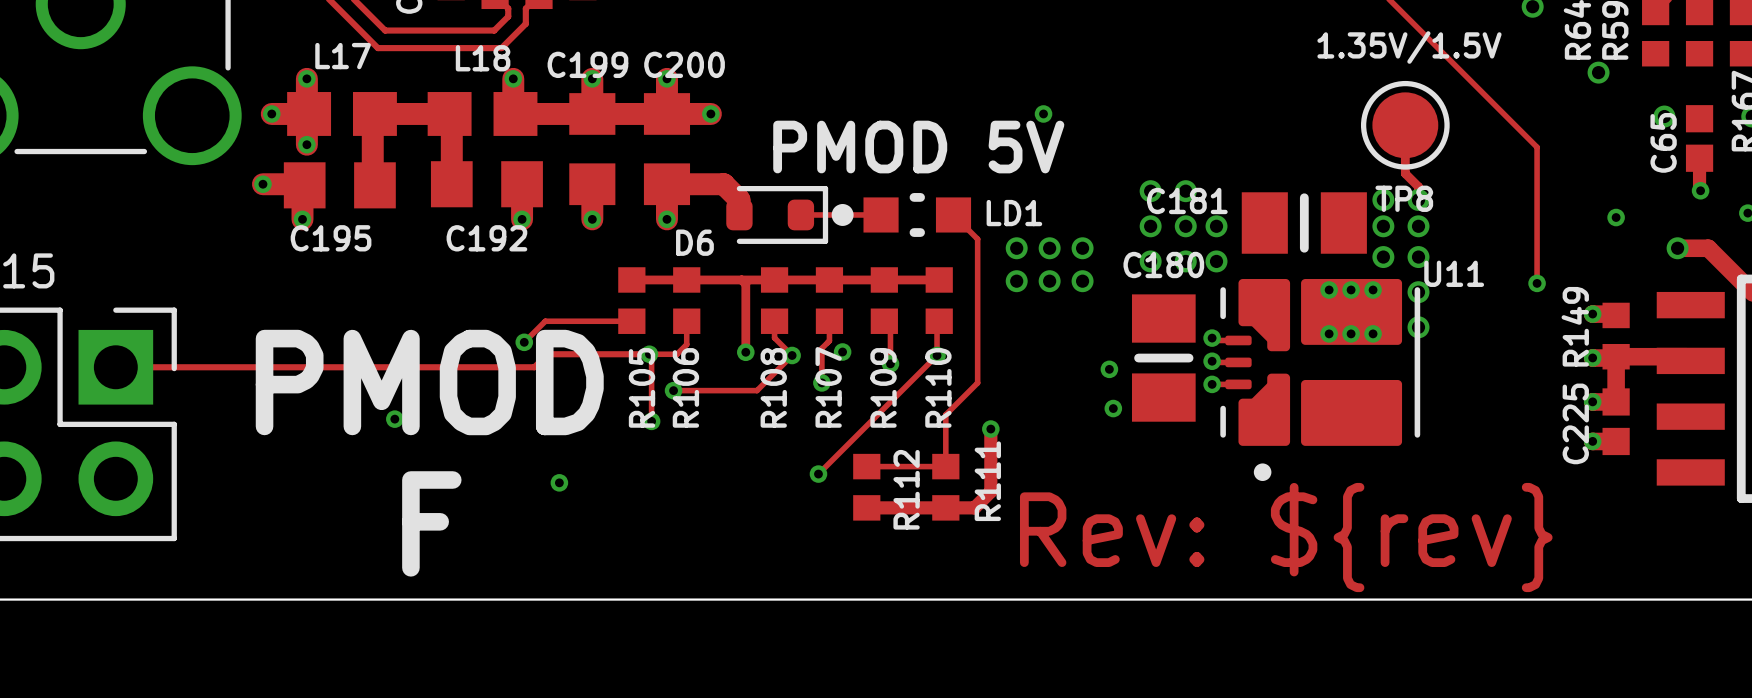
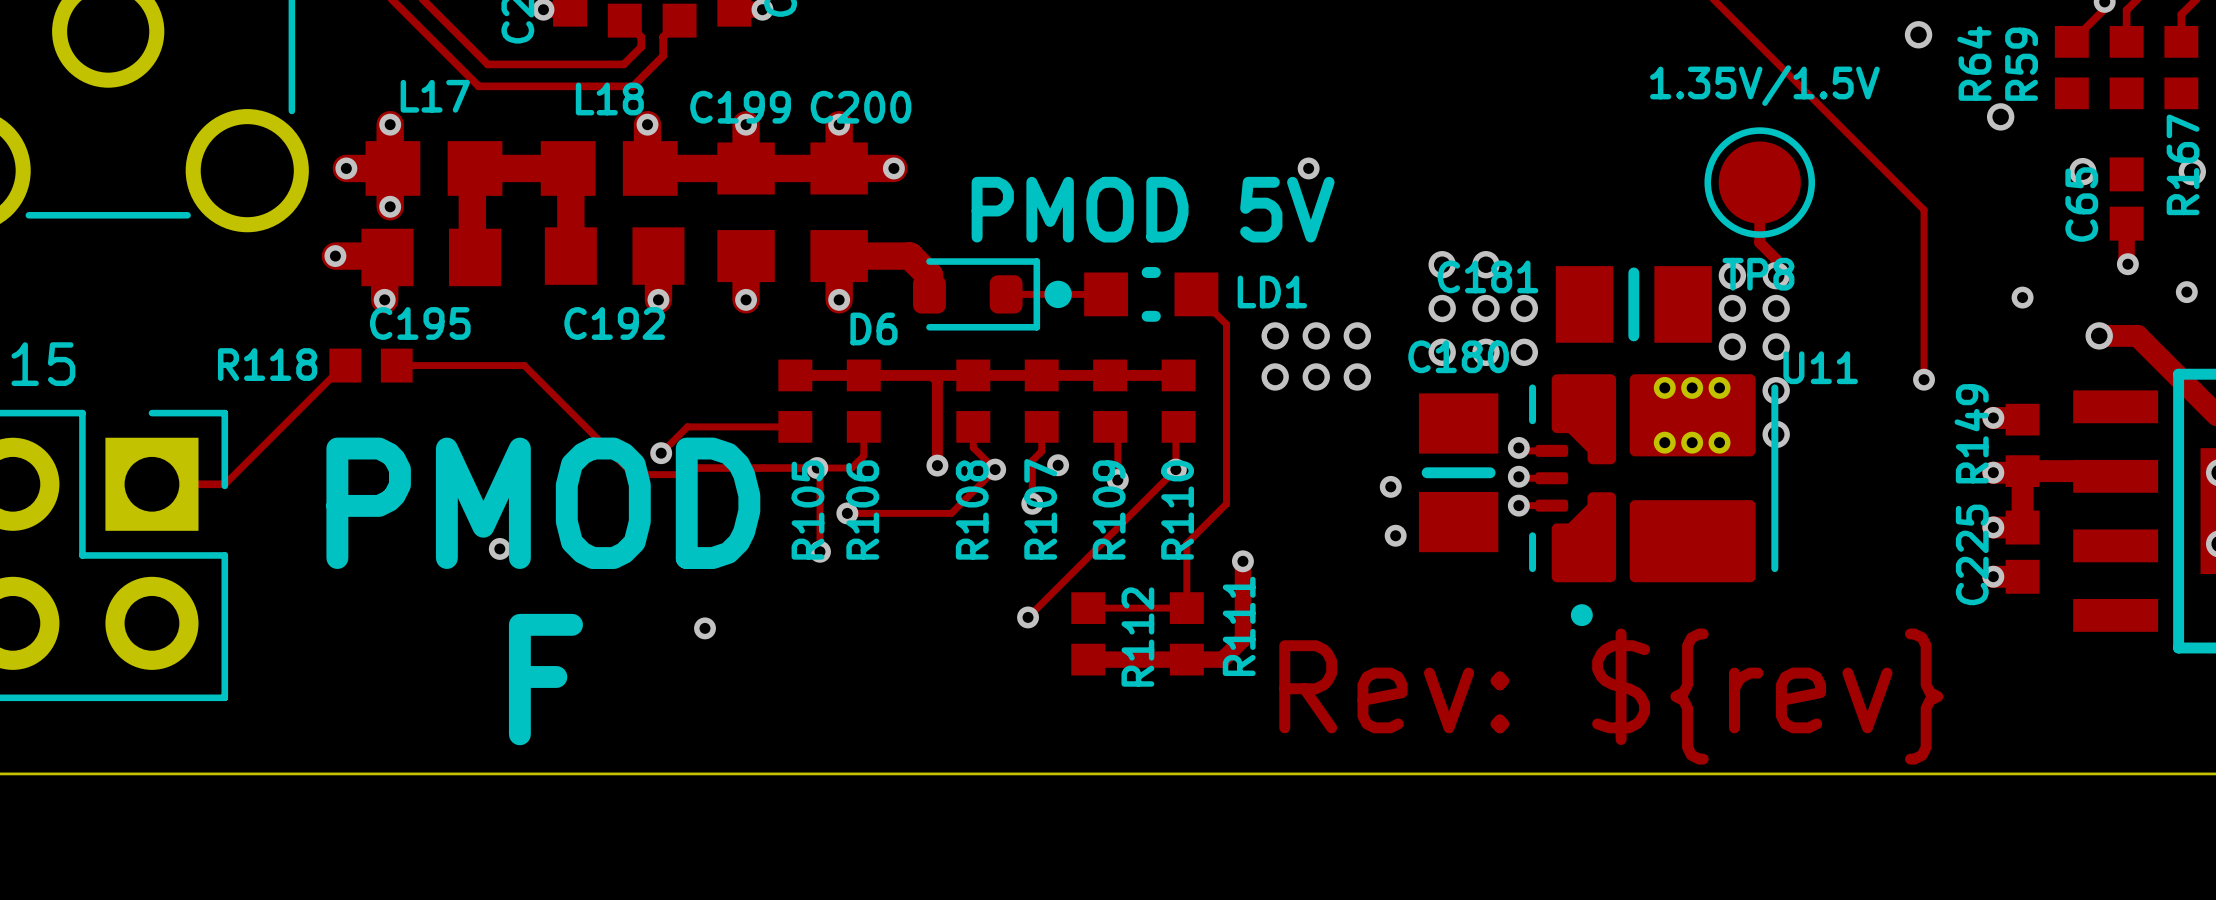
track: none -> (345, 365) (224, 484)
R118: none -> (371, 365)
track: (542, 359) (534, 367) (174, 367) -> (683, 474) (633, 474) (524, 365) (396, 365)

